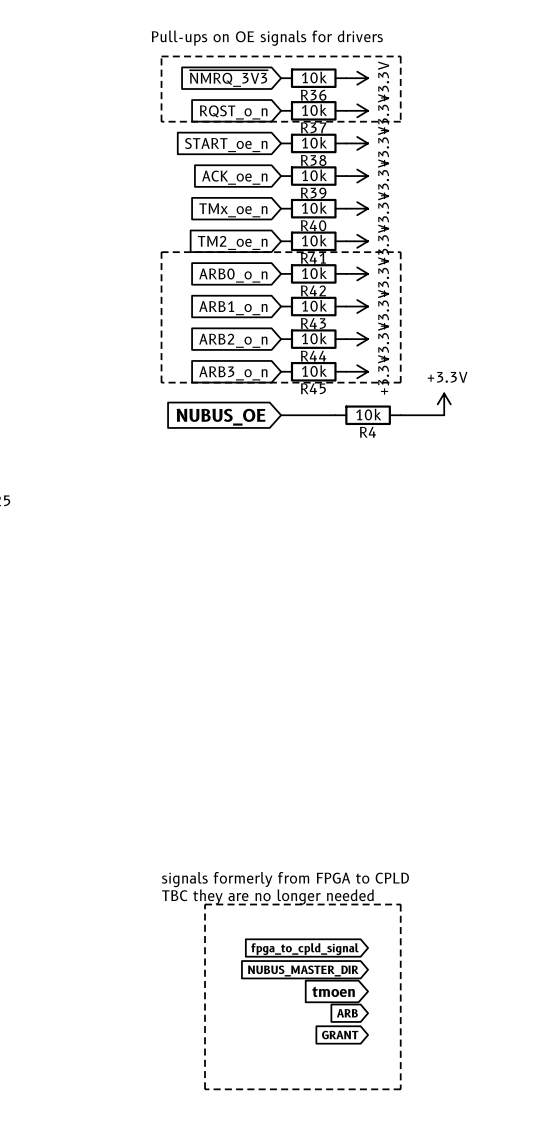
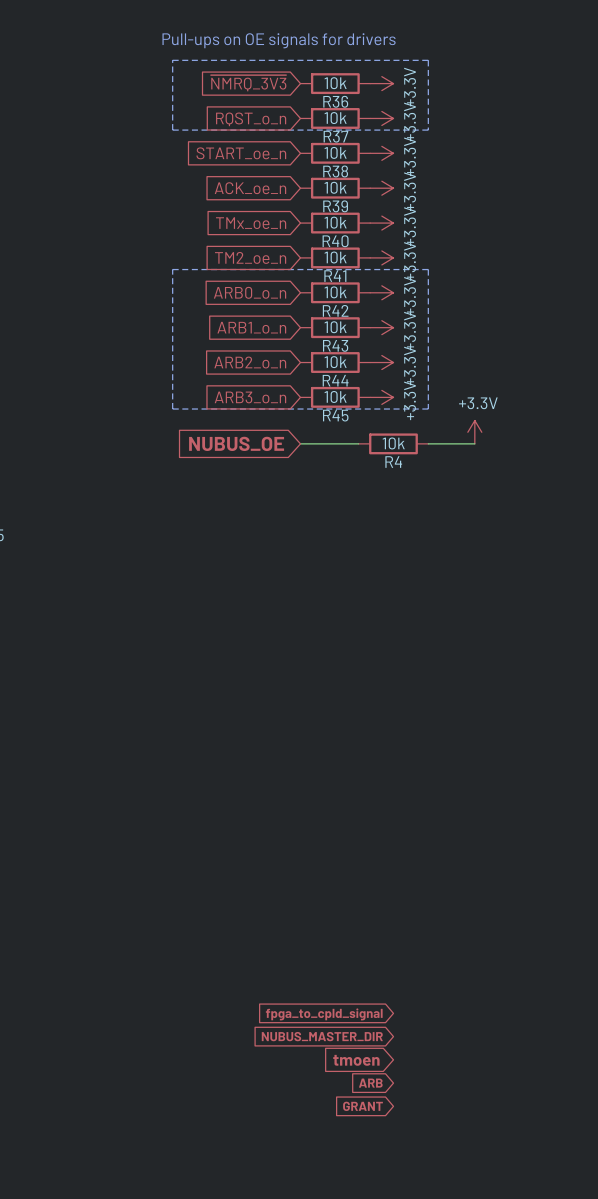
text: signals formerly from FPGA to CPLD (285, 879) -> none
text: TBC they are no longer needed (267, 897) -> none
line: (205, 904) (400, 904) (400, 1089) (205, 1089) (205, 904) -> none

